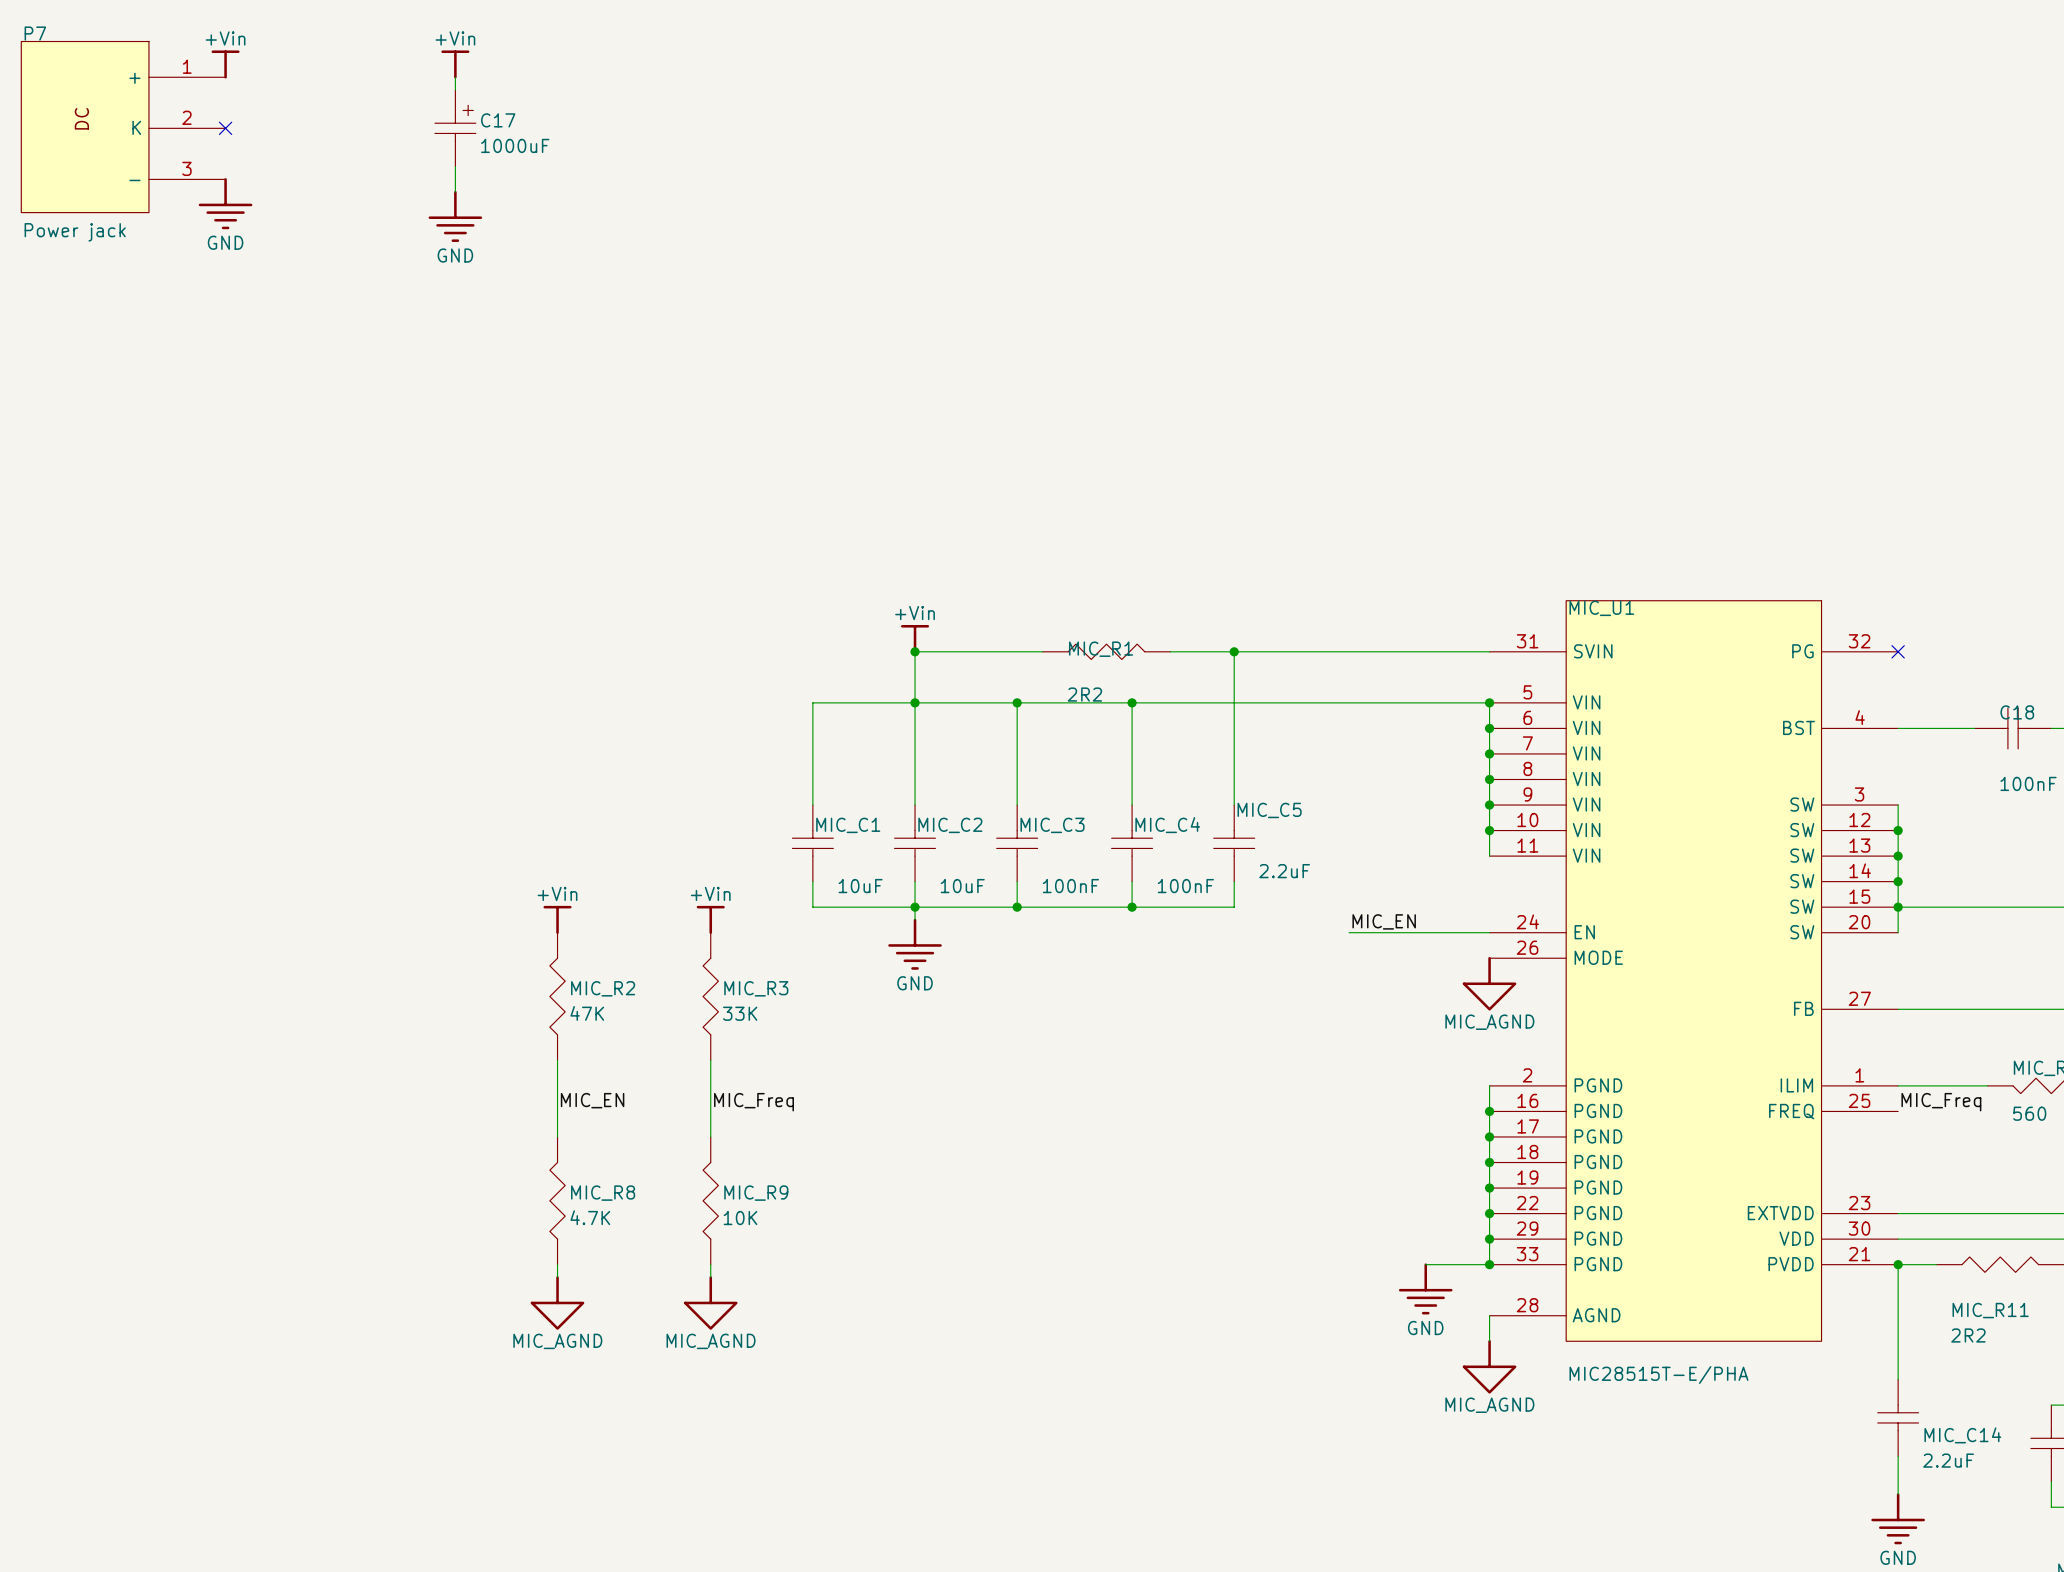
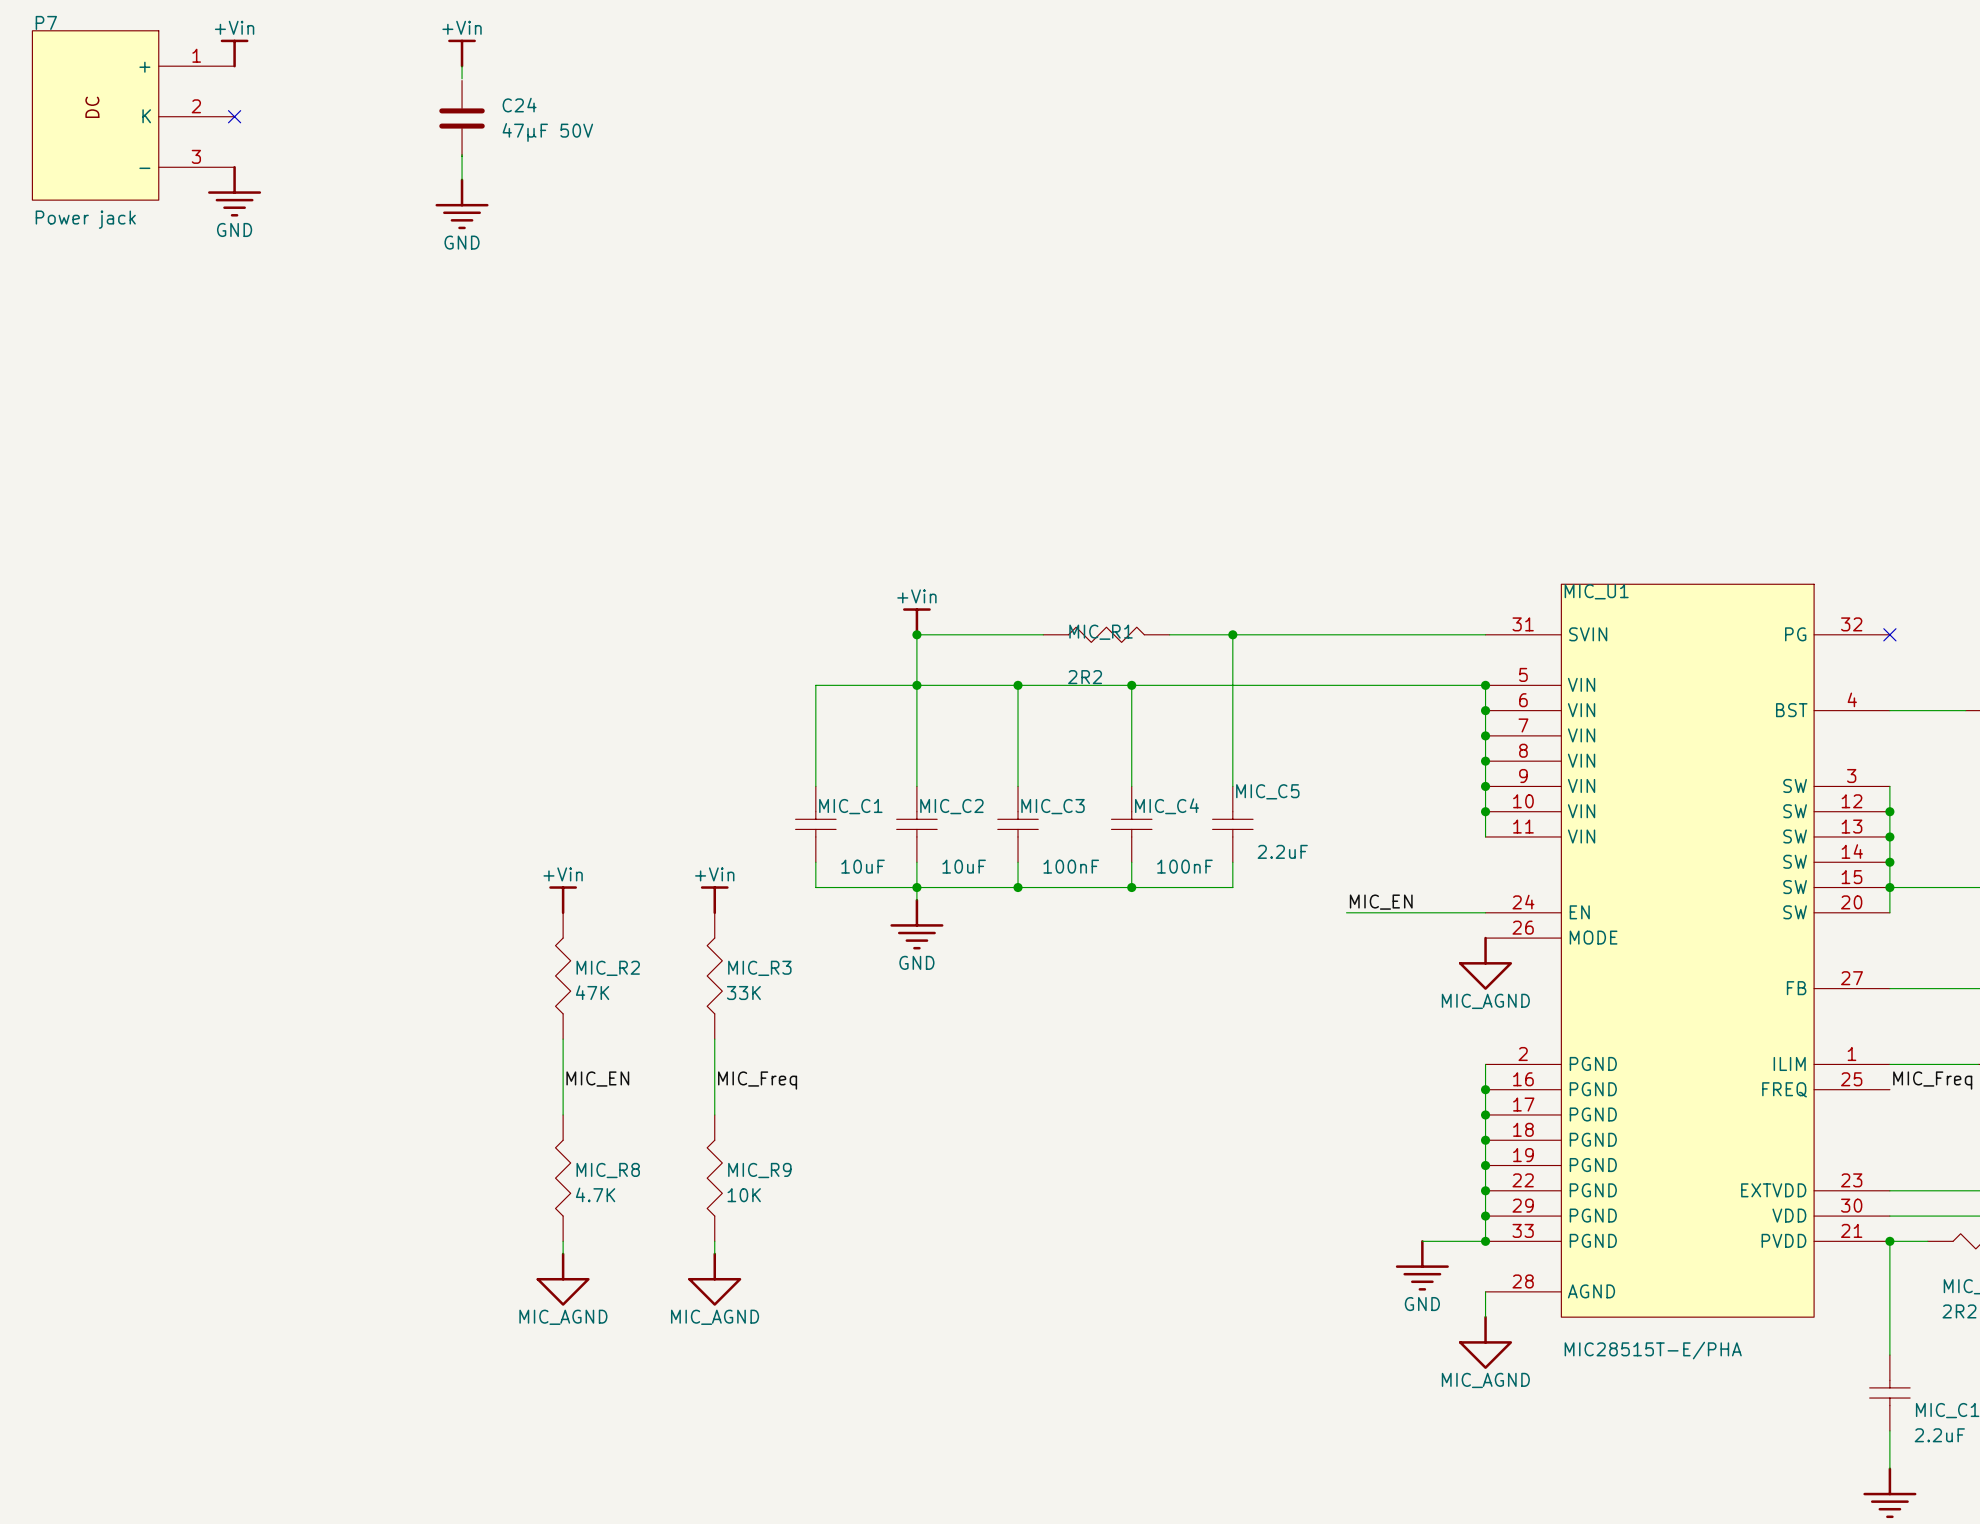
C17: (455, 128) -> none
C24: none -> 47µF 50V (462, 118)

